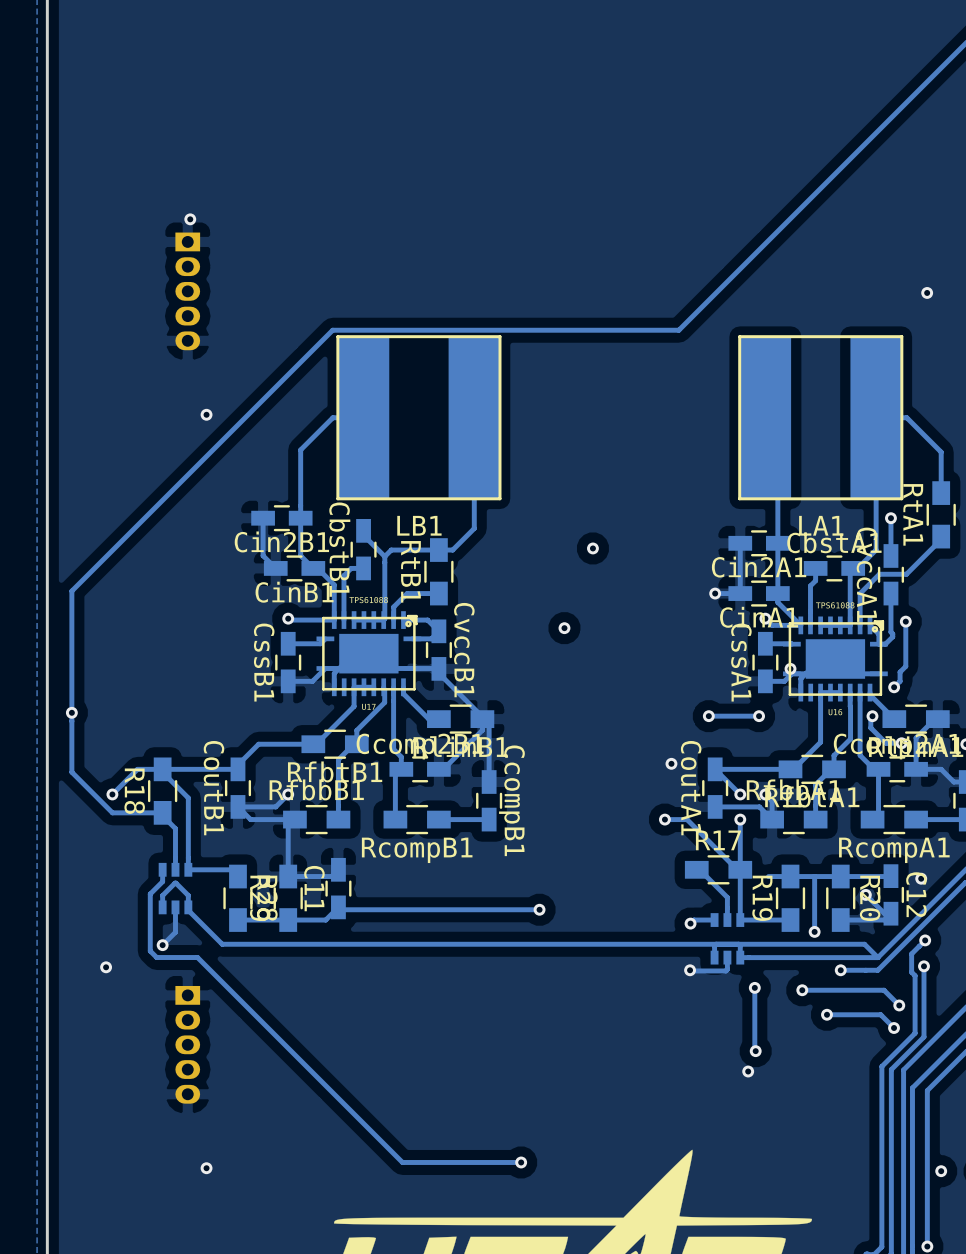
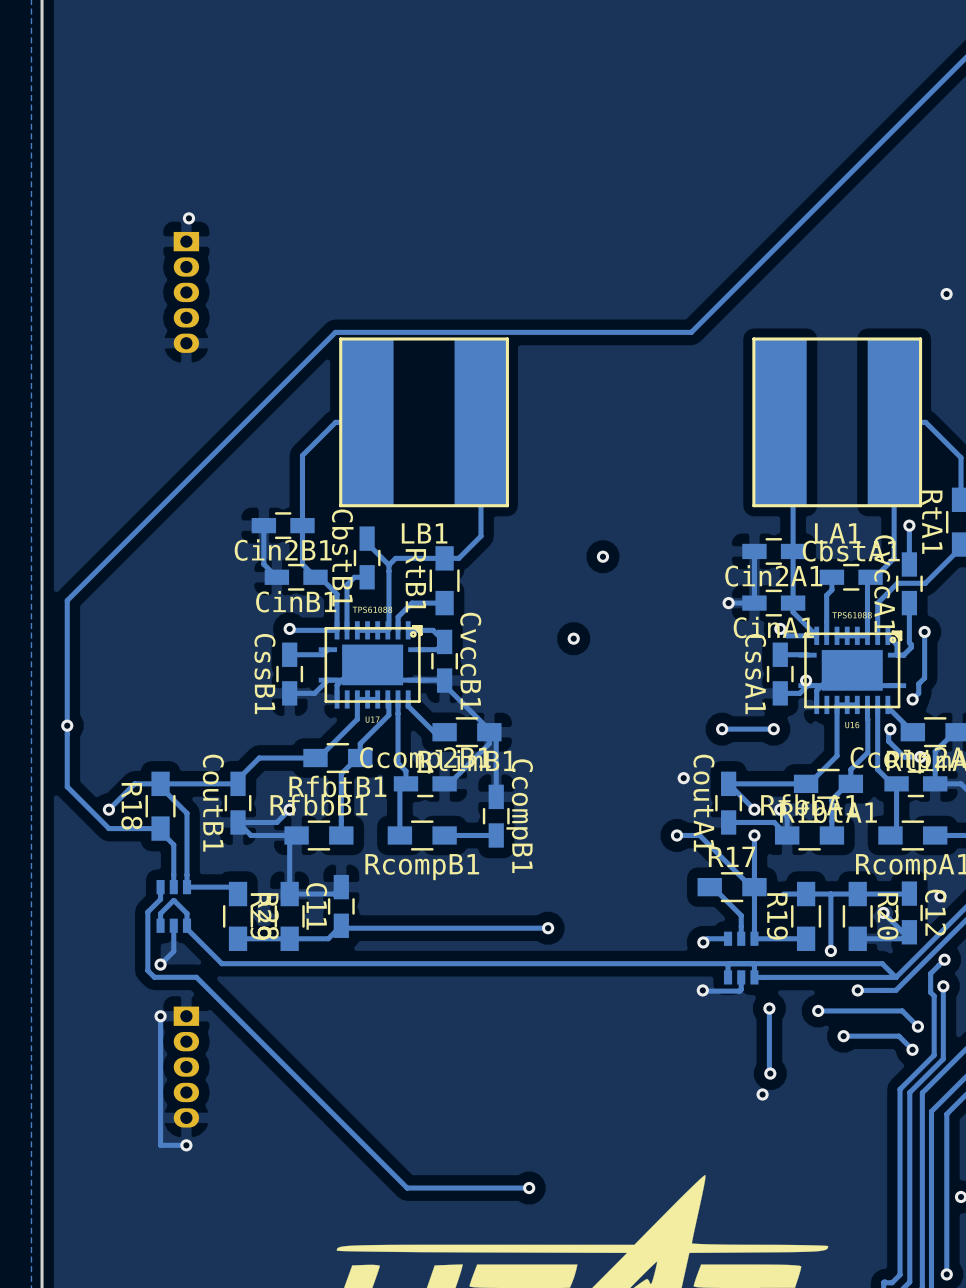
via: (206, 414) -> none
via position: (106, 967) -> (160, 1016)
track: none -> (160, 1016) (160, 1145) (186, 1145)
via position: (206, 1168) -> (186, 1145)

